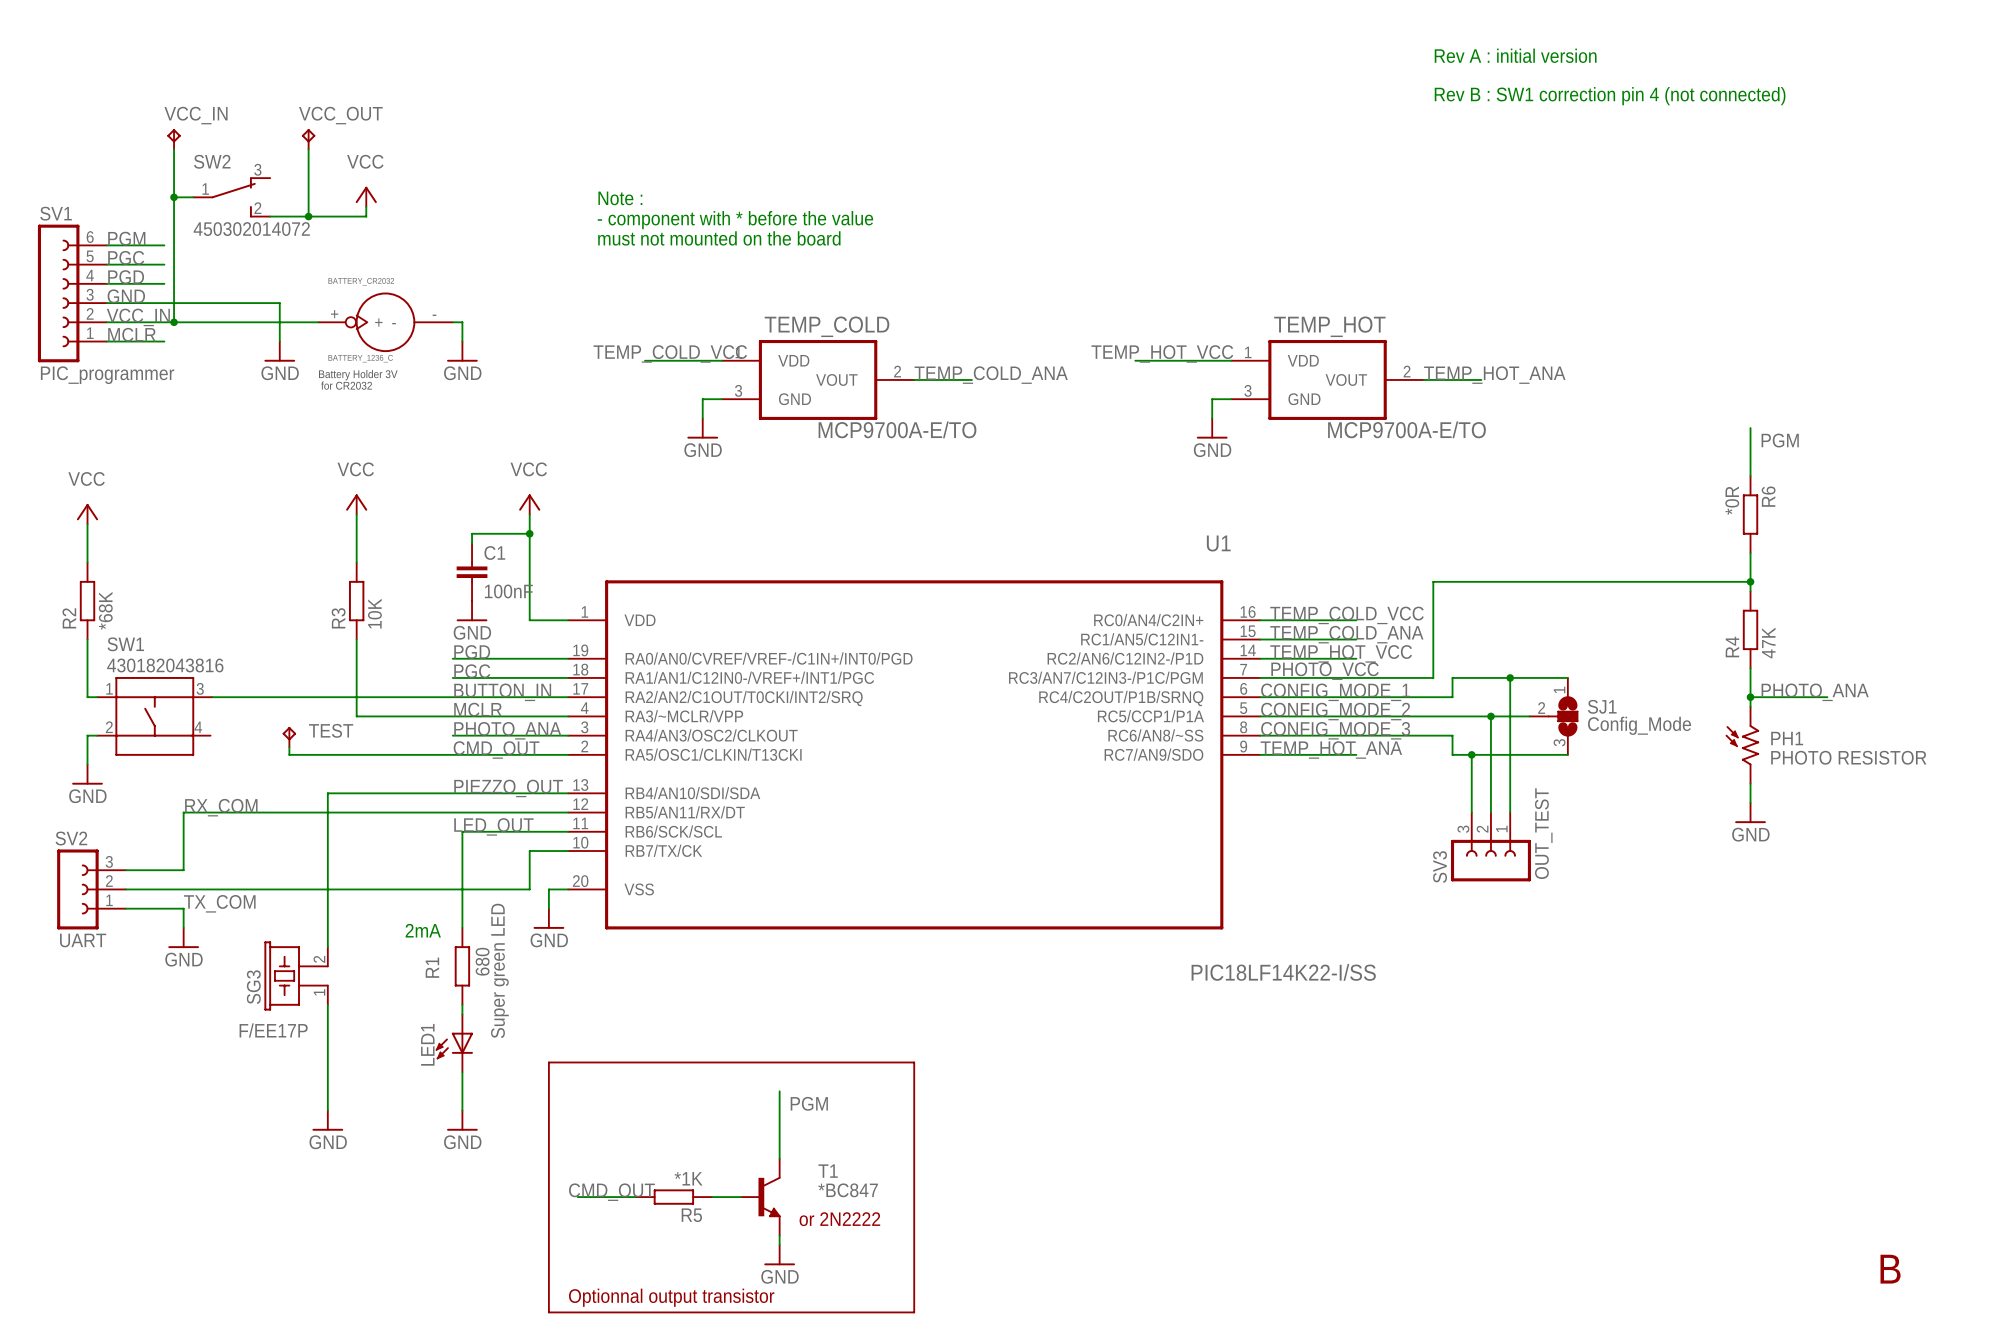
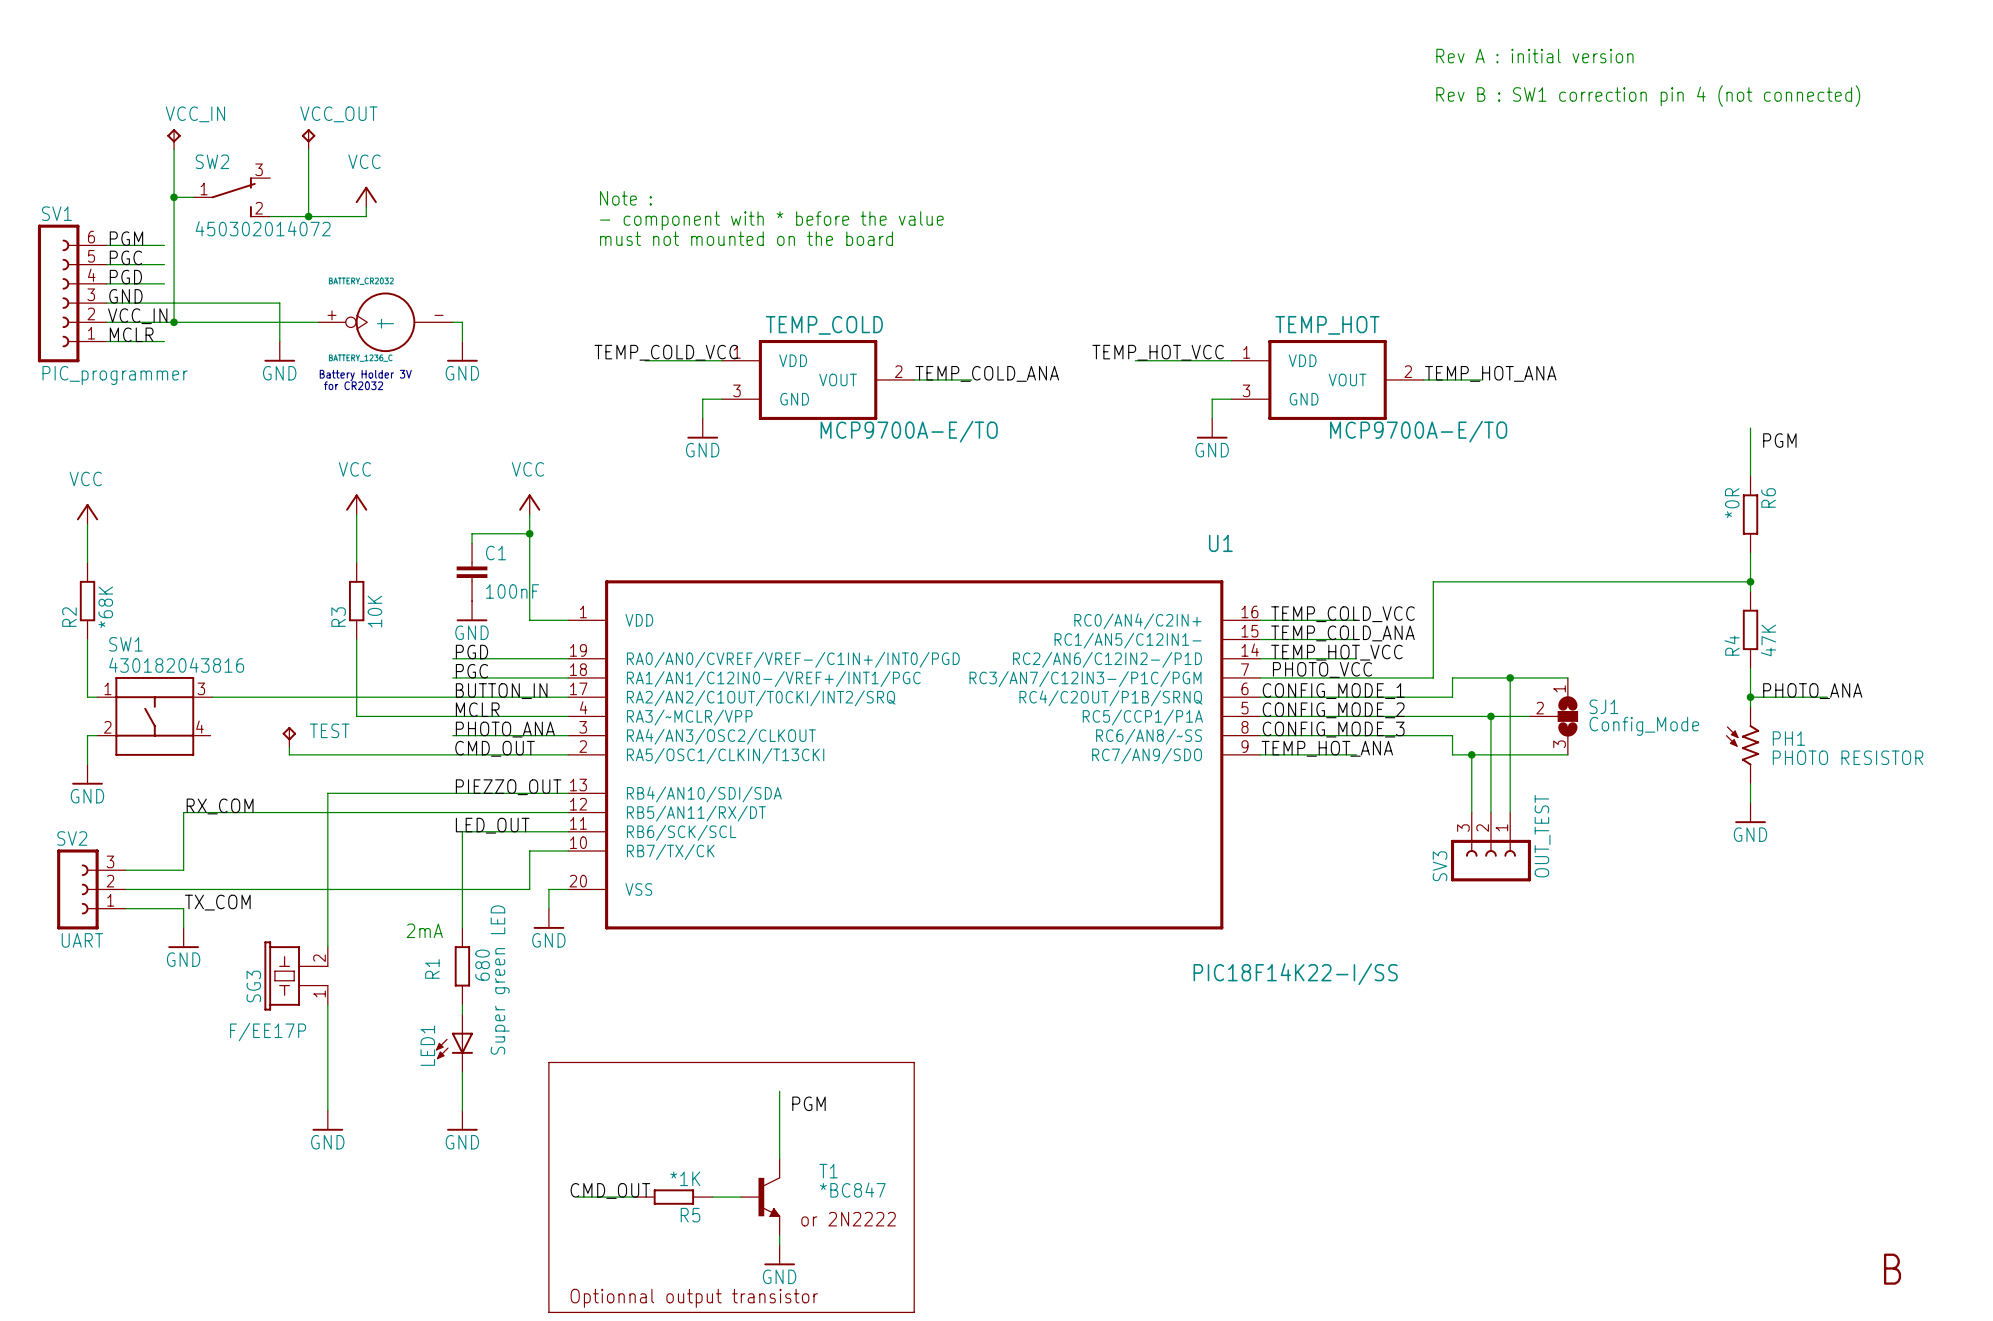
U1 value: PIC18LF14K22-I/SS (1283, 972) -> PIC18F14K22-I/SS (1295, 974)

